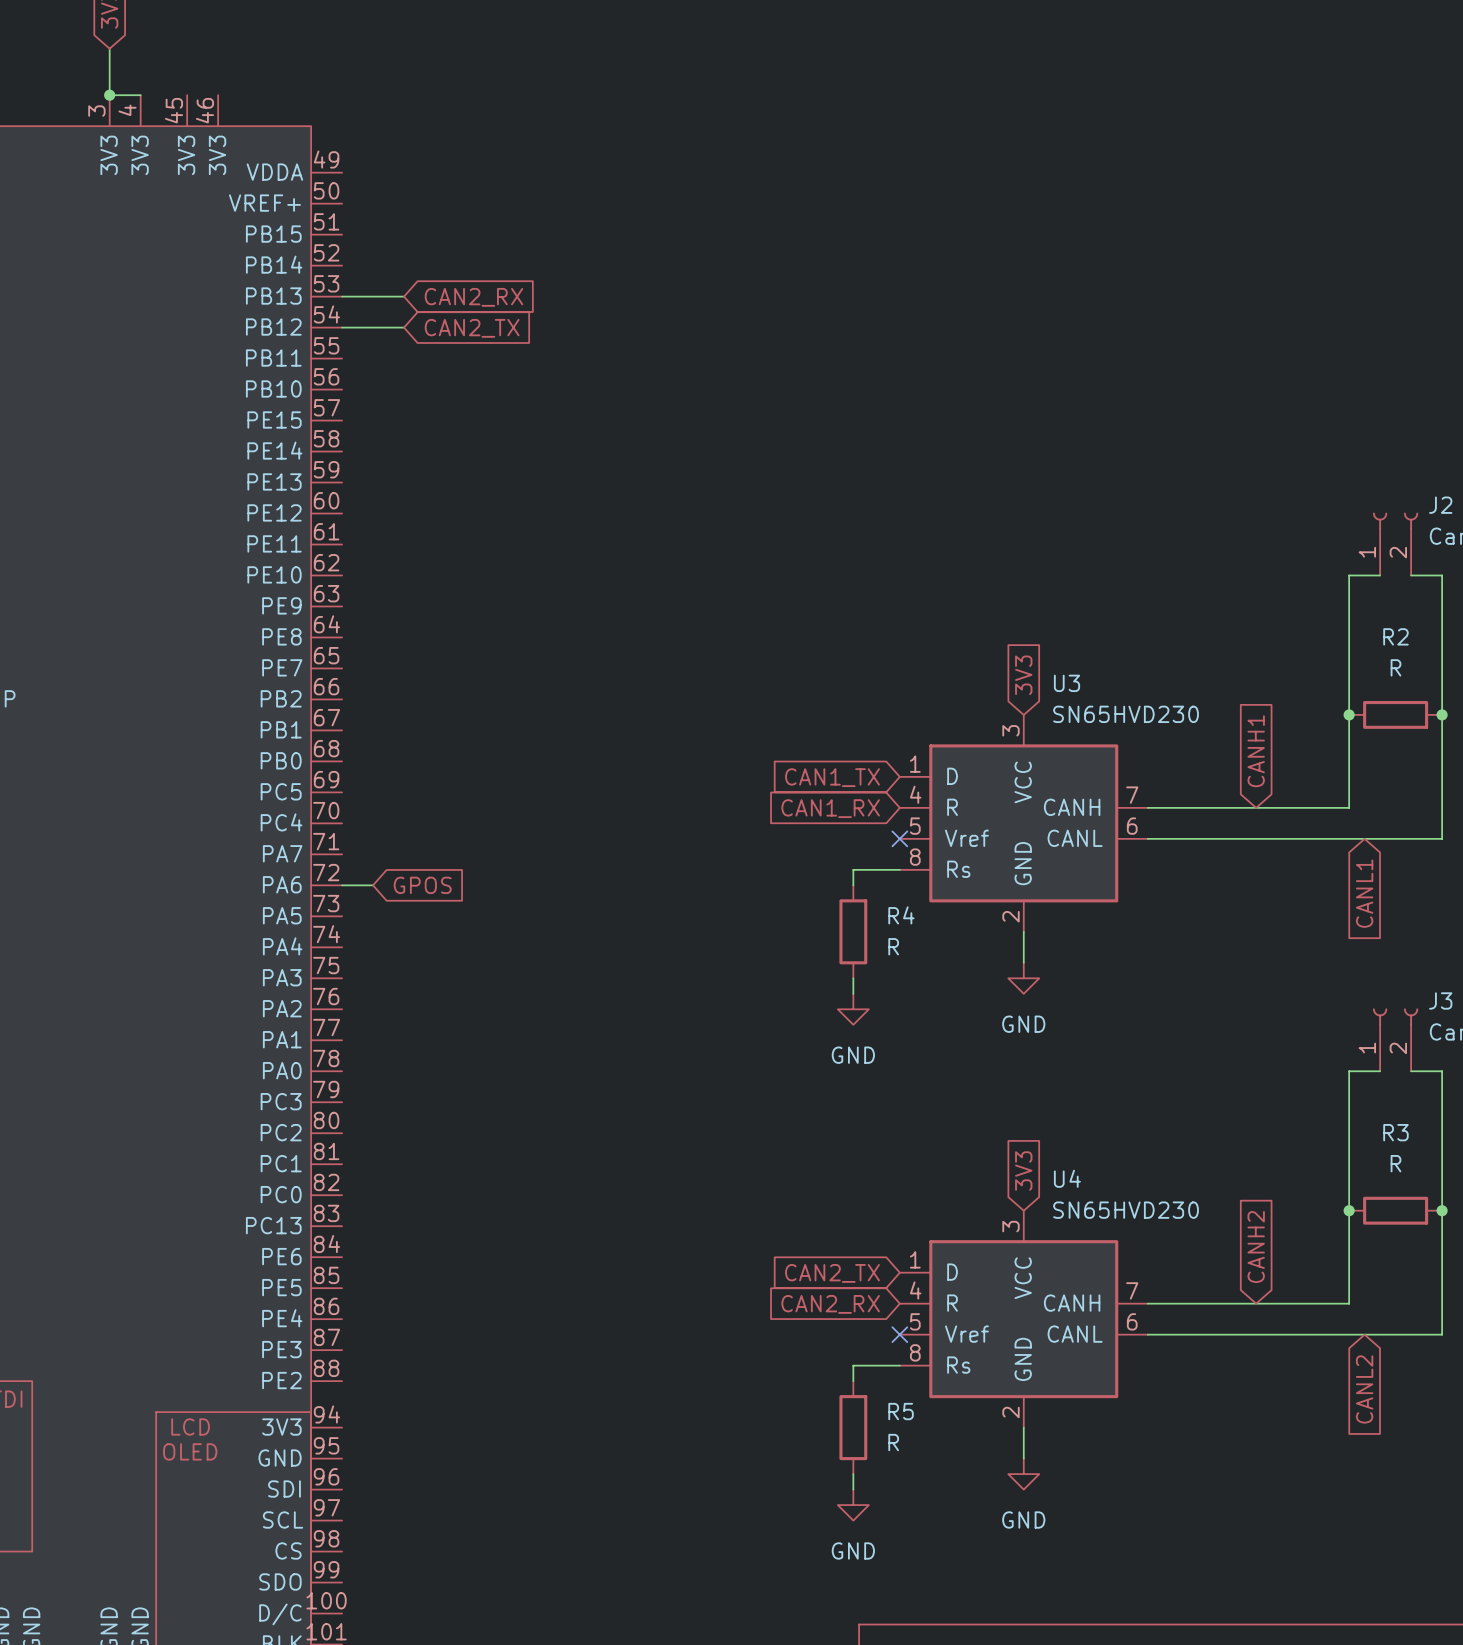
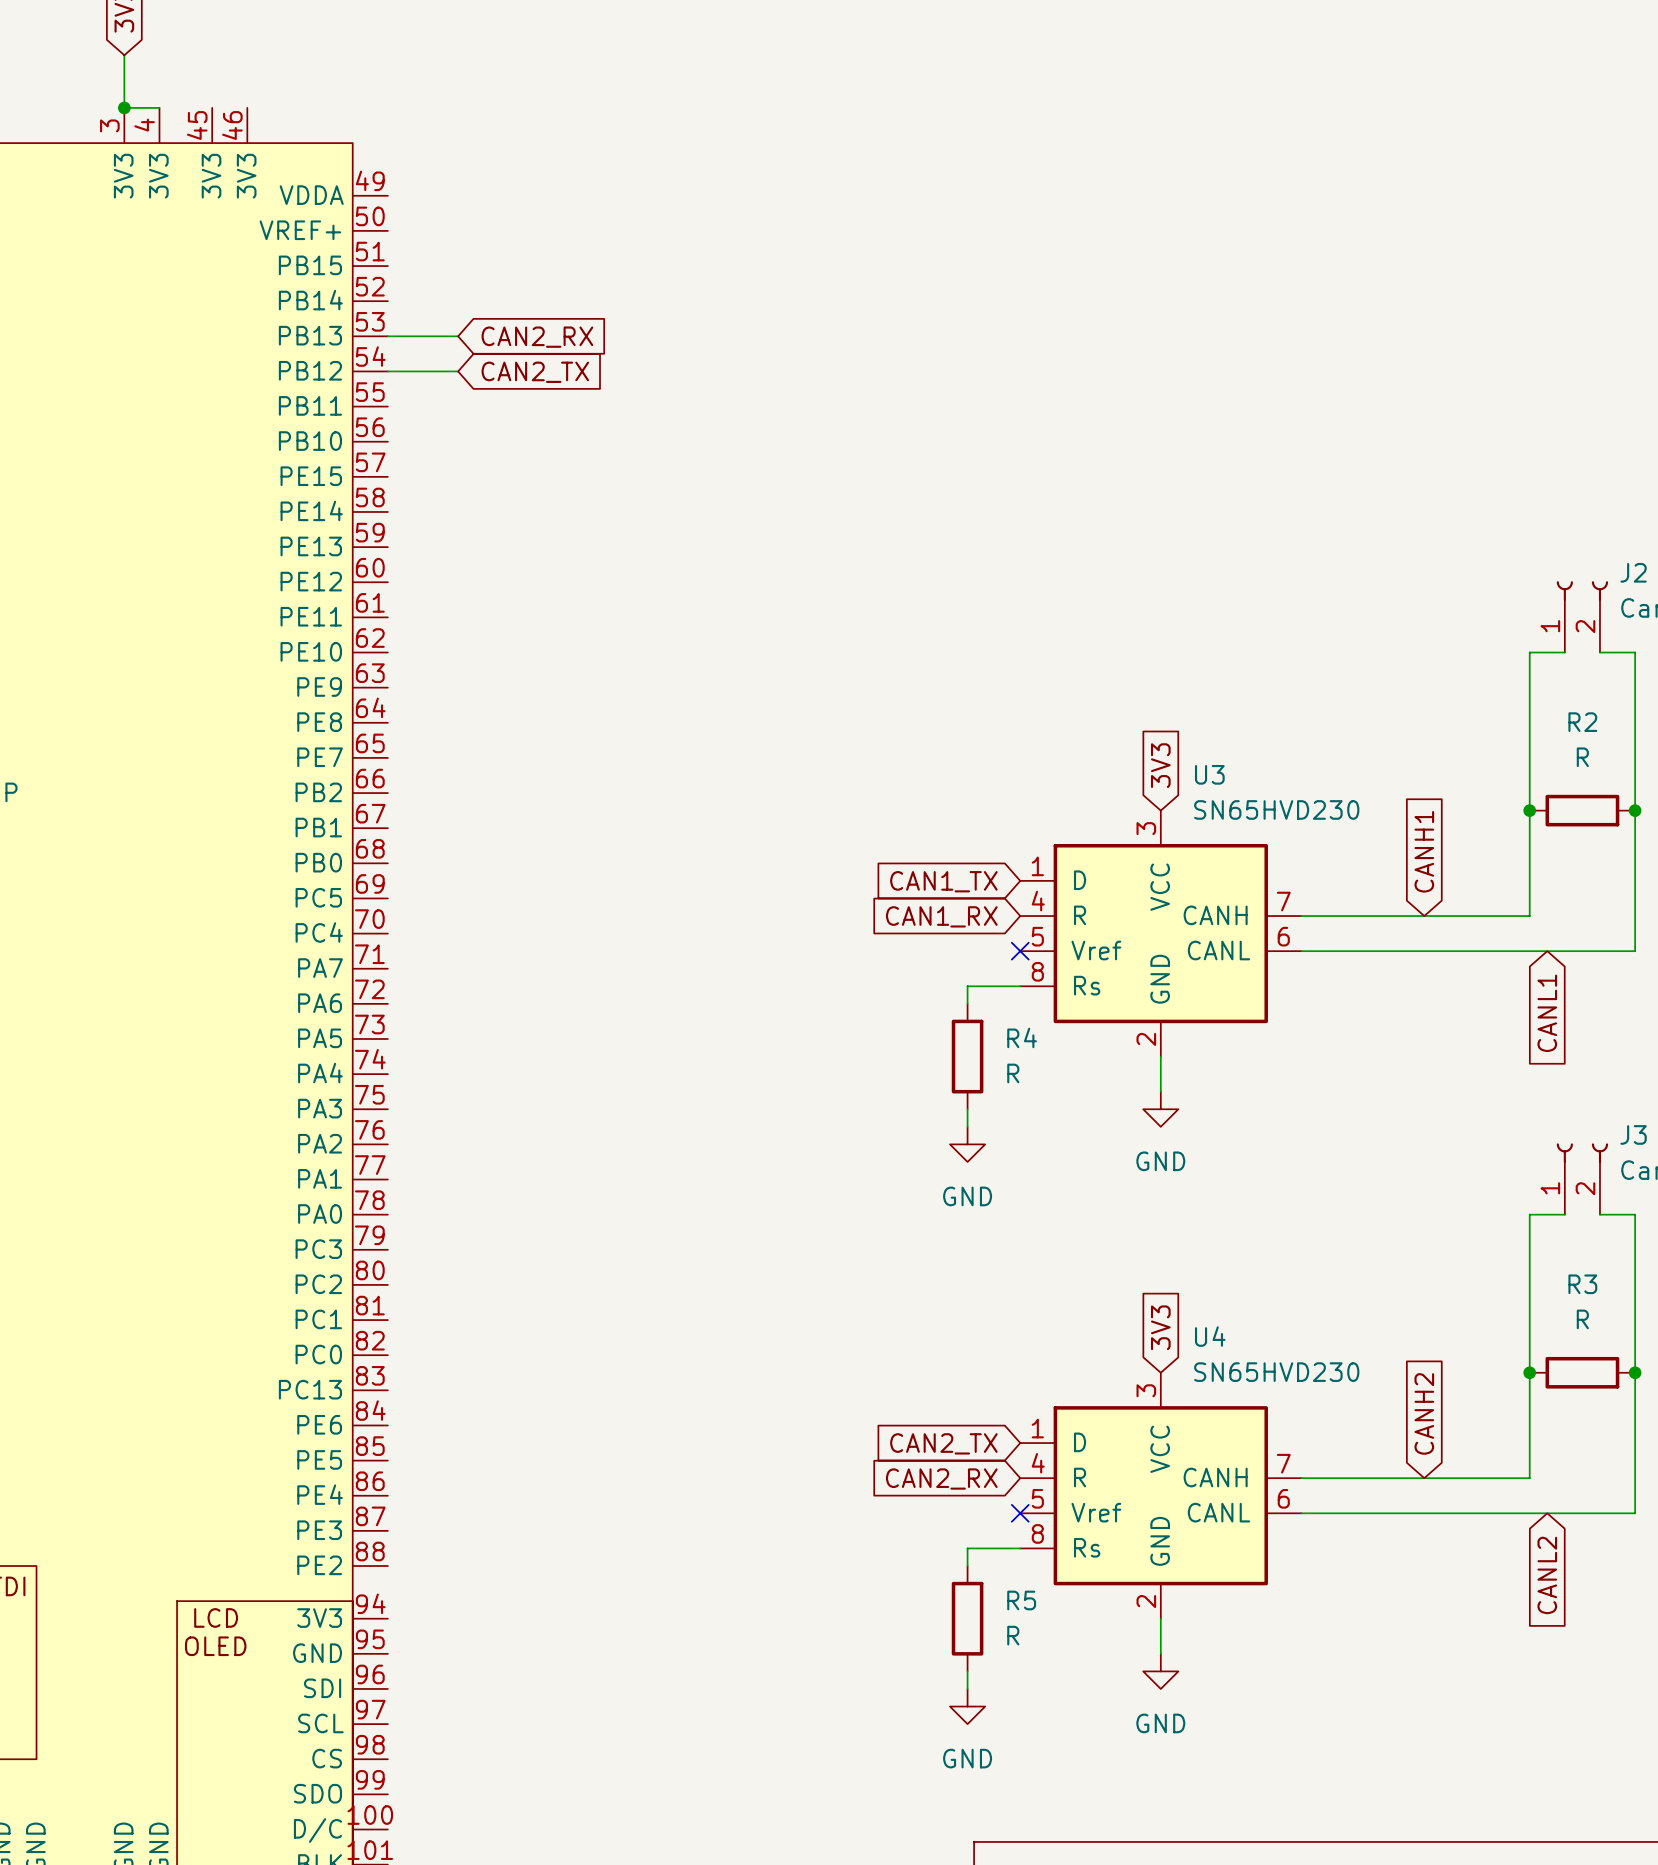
wire: (342, 885) (373, 885) -> none
global label: GPOS (422, 885) -> none

